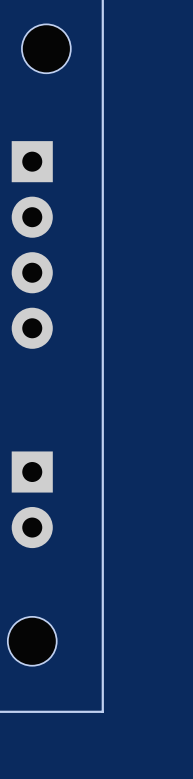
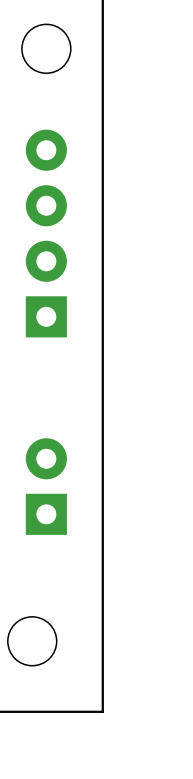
part rotation: 0° (32, 244) -> 180° (46, 233)
part rotation: 0° (32, 499) -> 180° (46, 486)

